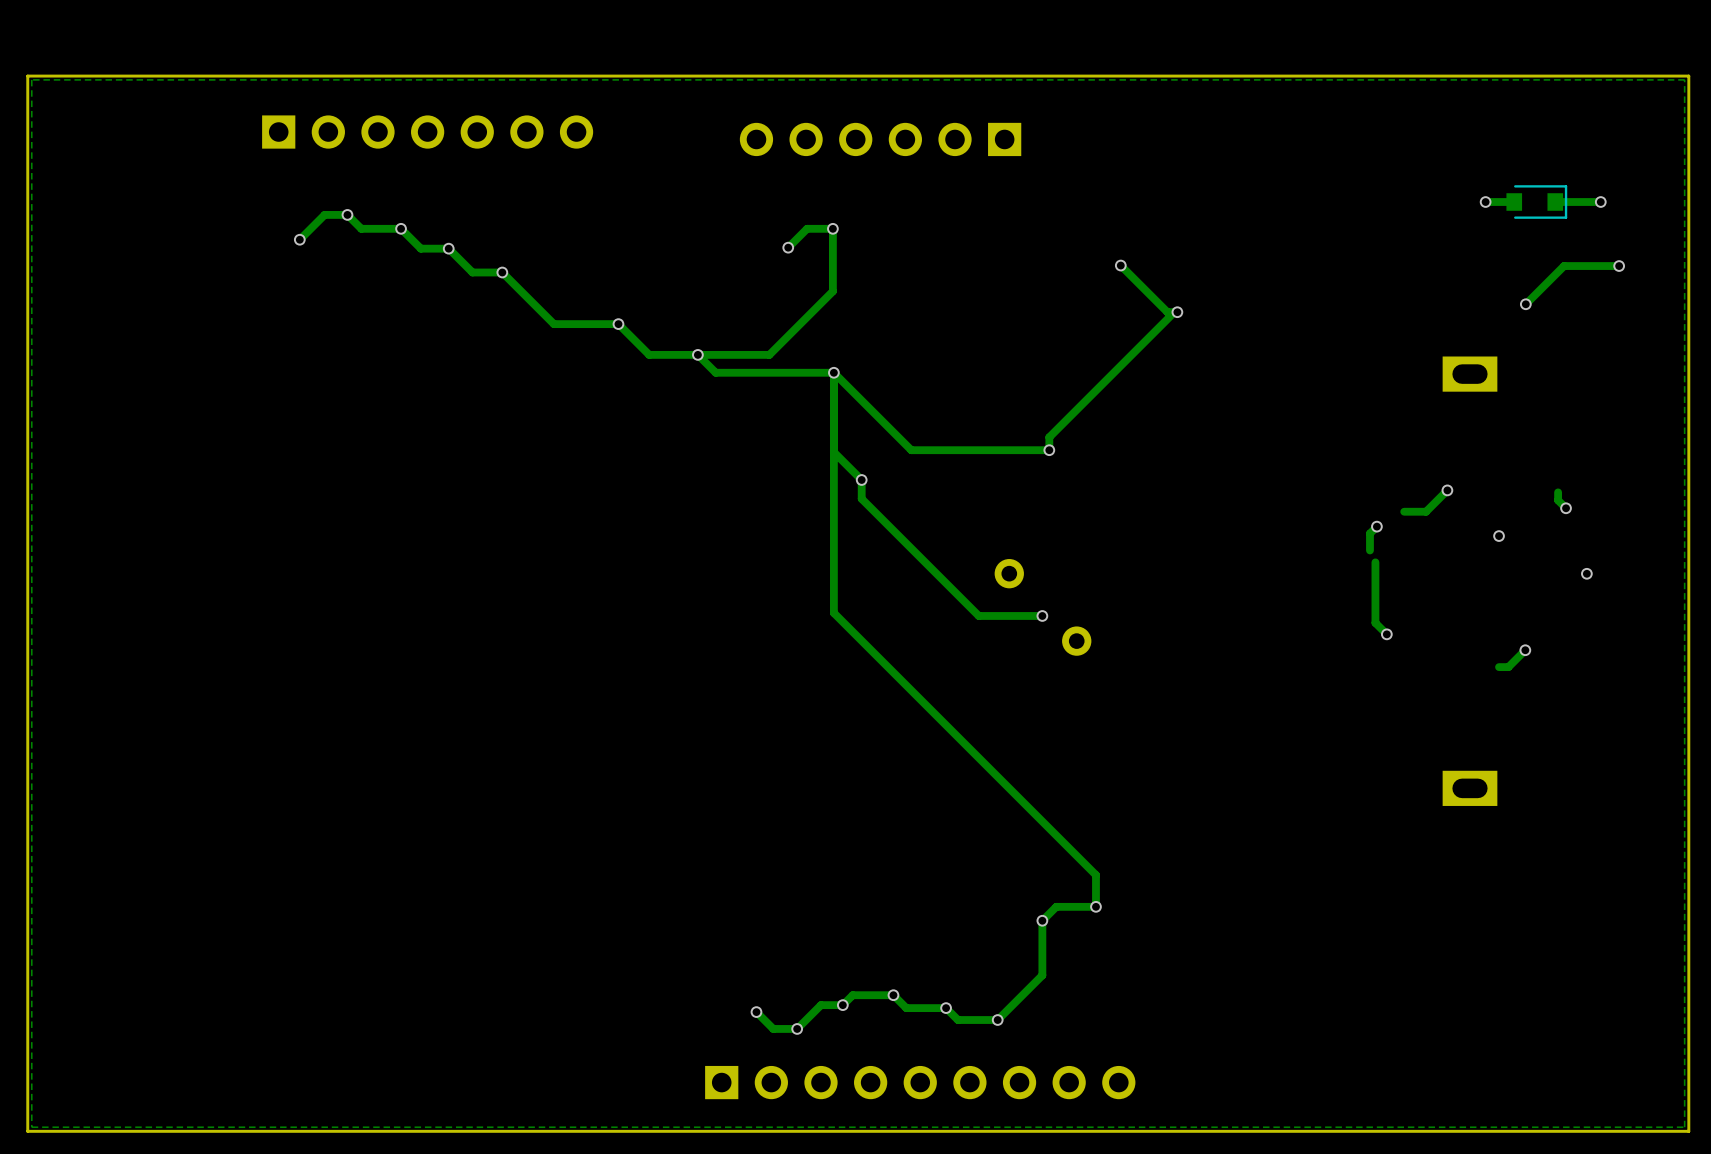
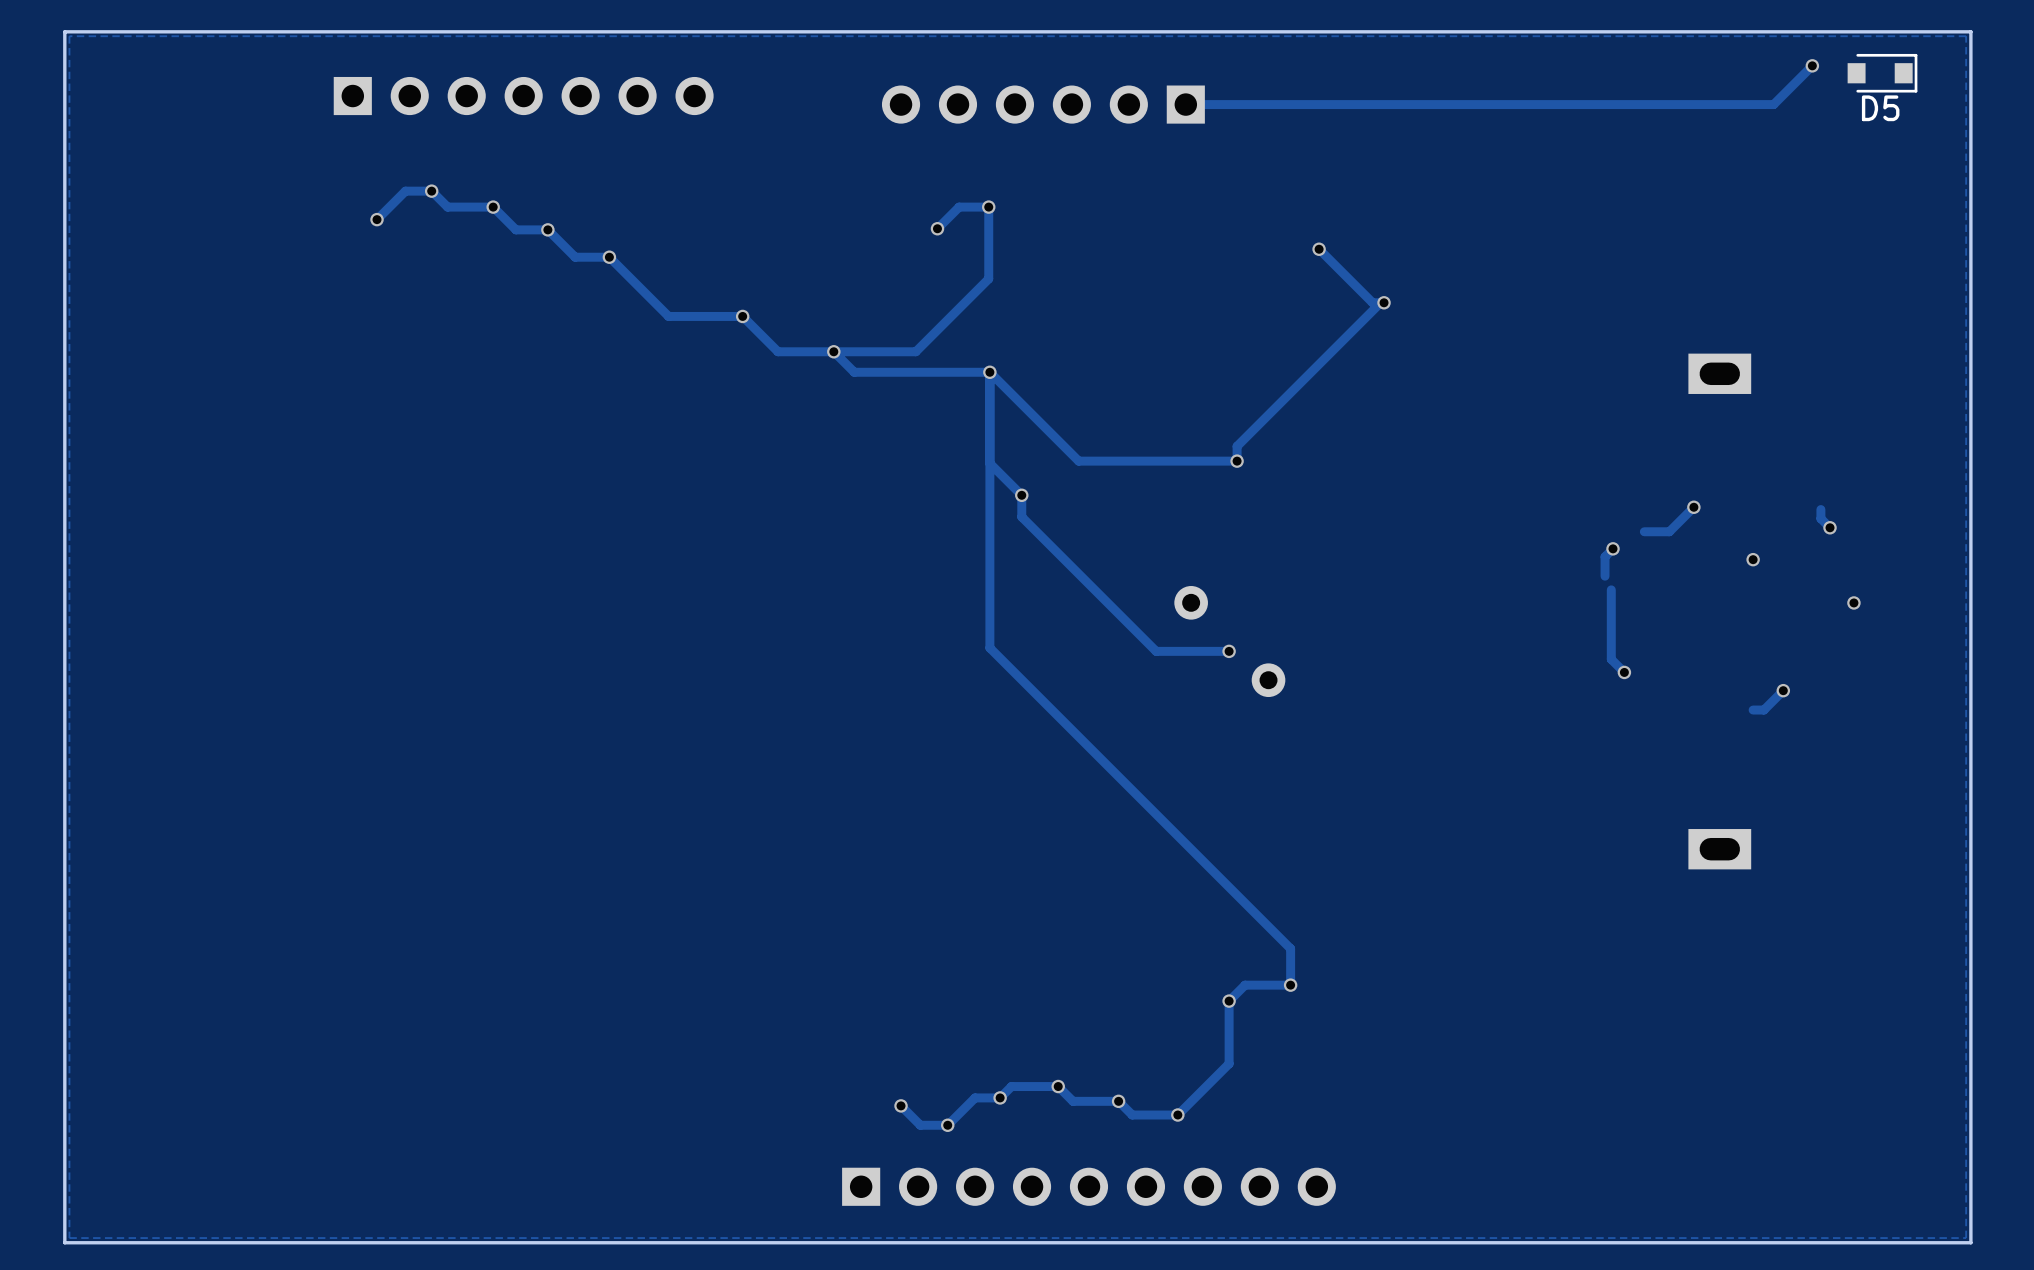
track: none -> (1812, 65) (1773, 104) (1185, 104)
via: none -> (1812, 65)
D5: none -> (1882, 73)
via: (1485, 202) -> none
track: (1514, 202) (1485, 202) -> none
part: (1536, 202) -> none
track: (1600, 202) (1555, 202) -> none
via: (1600, 202) -> none
track: (1619, 266) (1564, 266) (1525, 304) -> none
via: (1619, 266) -> none
via: (1525, 304) -> none

